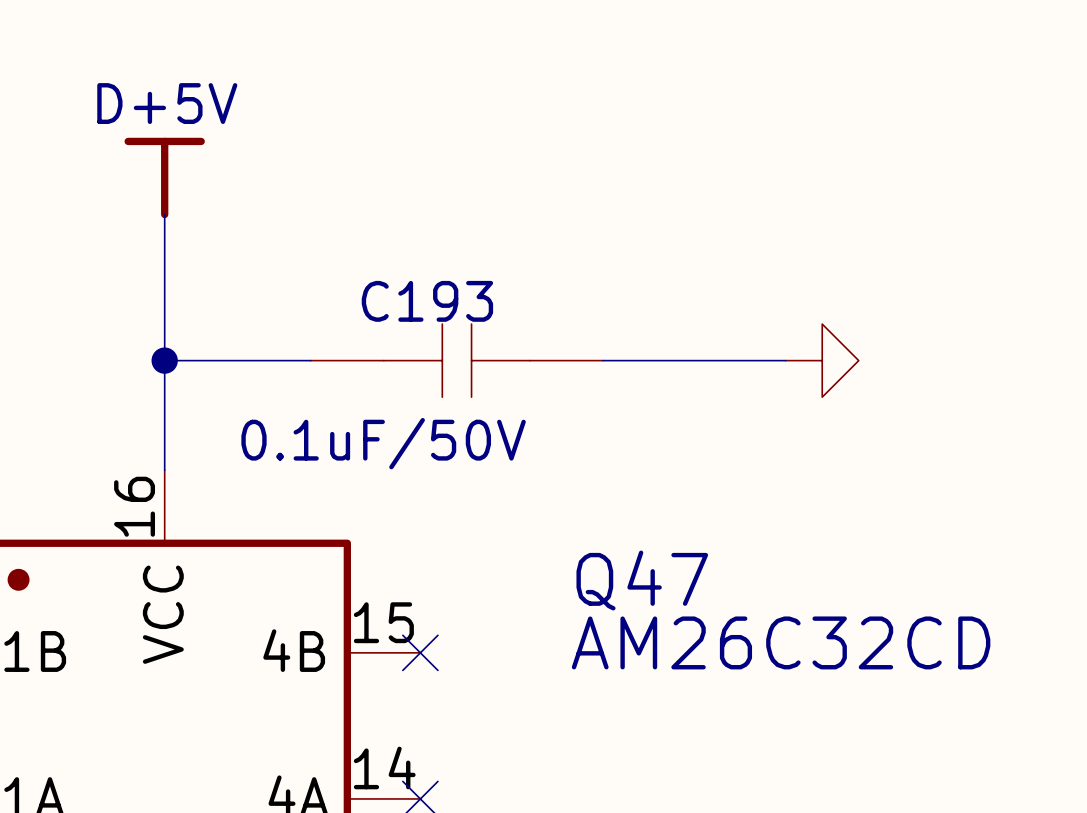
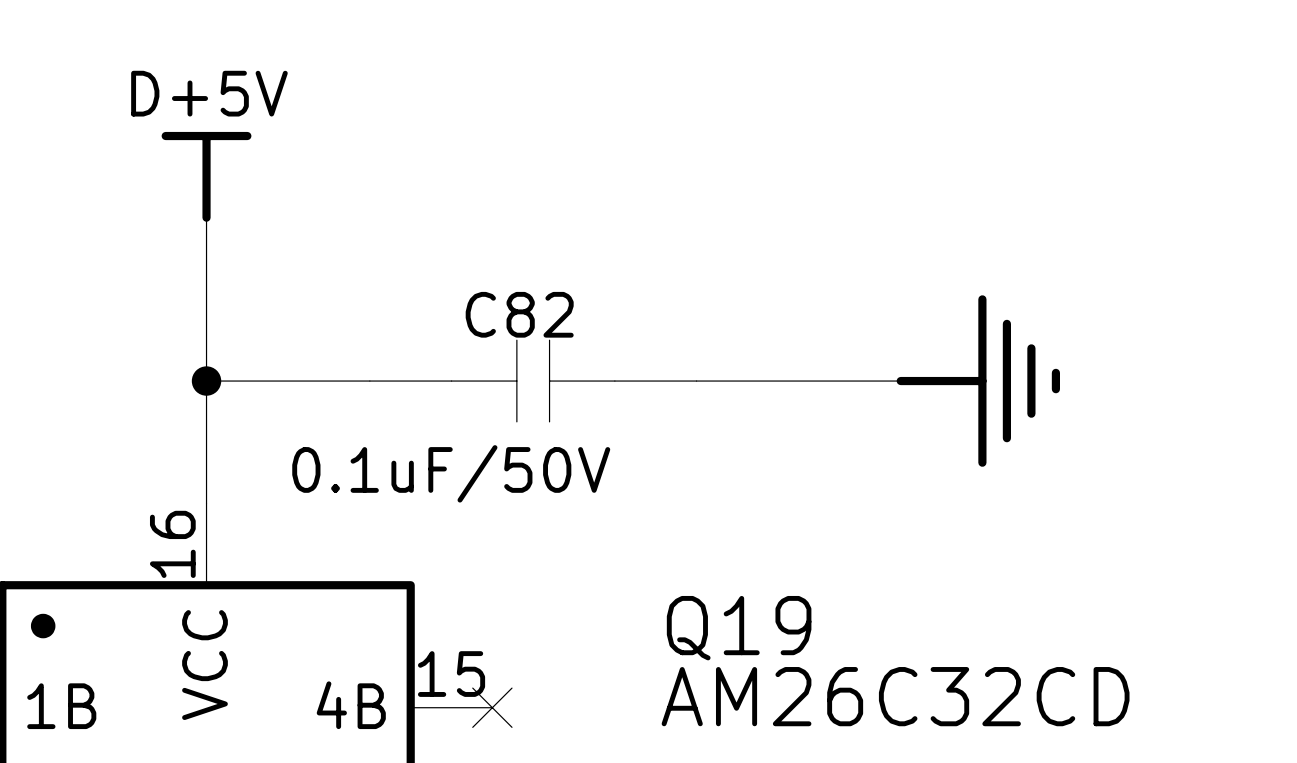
C193 name: C193 (427, 301) -> C82 (519, 314)
power symbol: (822, 360) -> none
power symbol: none -> (978, 381)
Q47 name: Q47 (642, 580) -> Q19 (739, 628)

